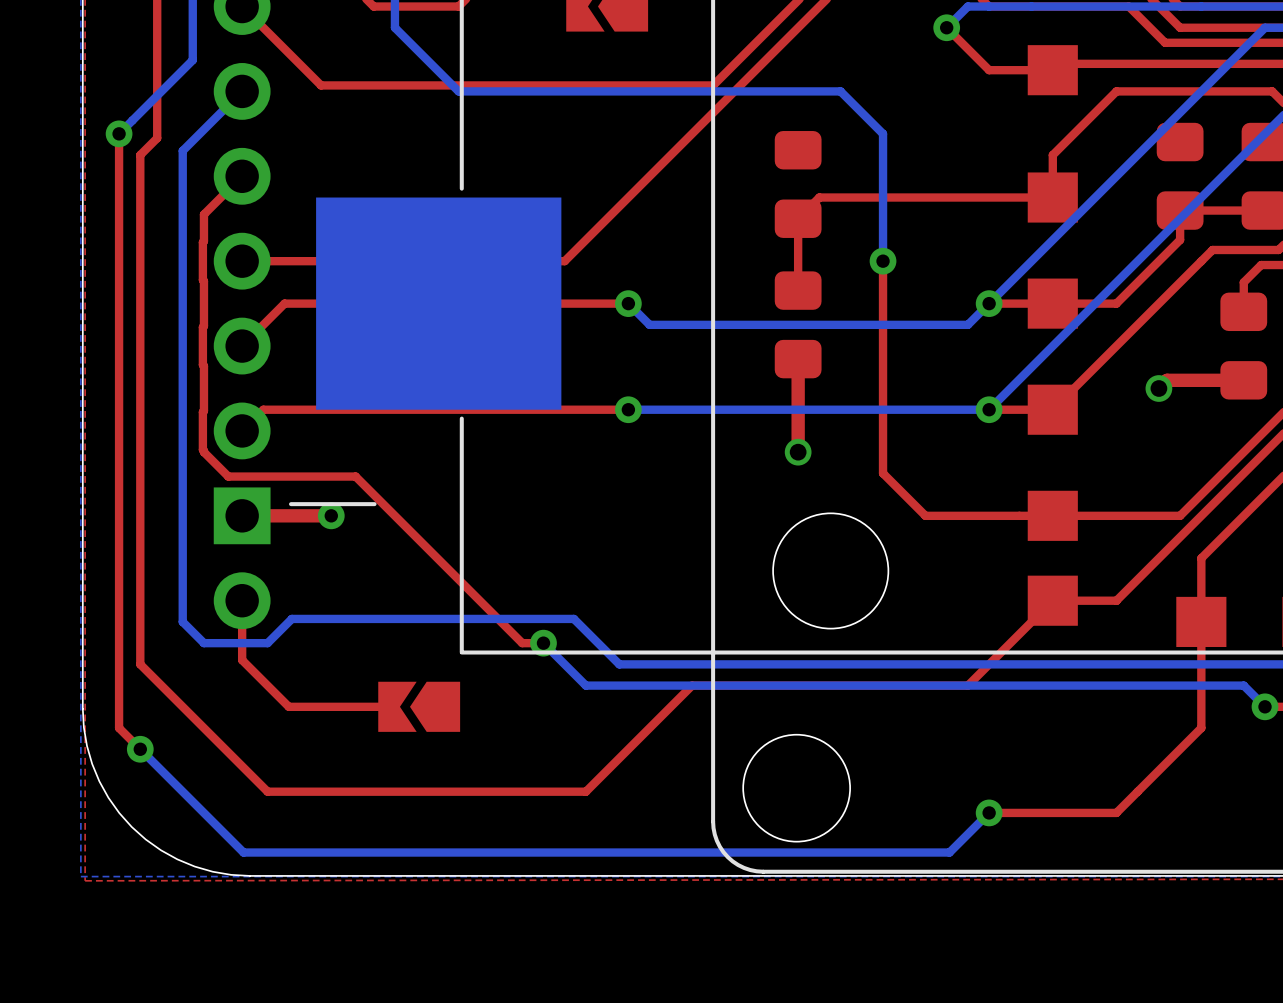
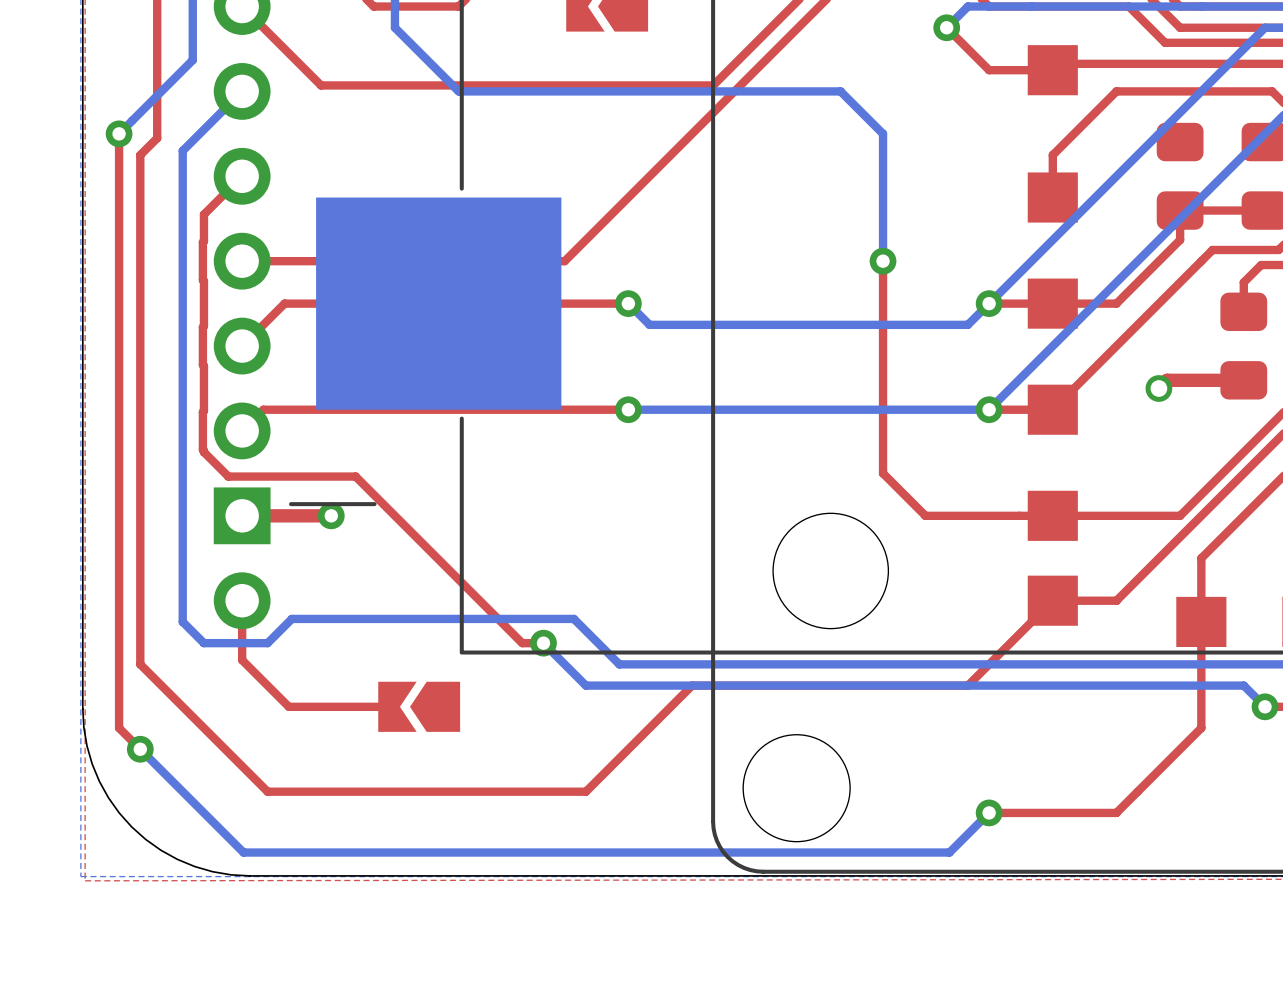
part: (798, 184) -> none
top track: (1052, 197) (819, 197) (798, 218) (798, 290) -> none
part: (798, 324) -> none
top track: (798, 359) (798, 452) -> none
via: (798, 452) -> none

